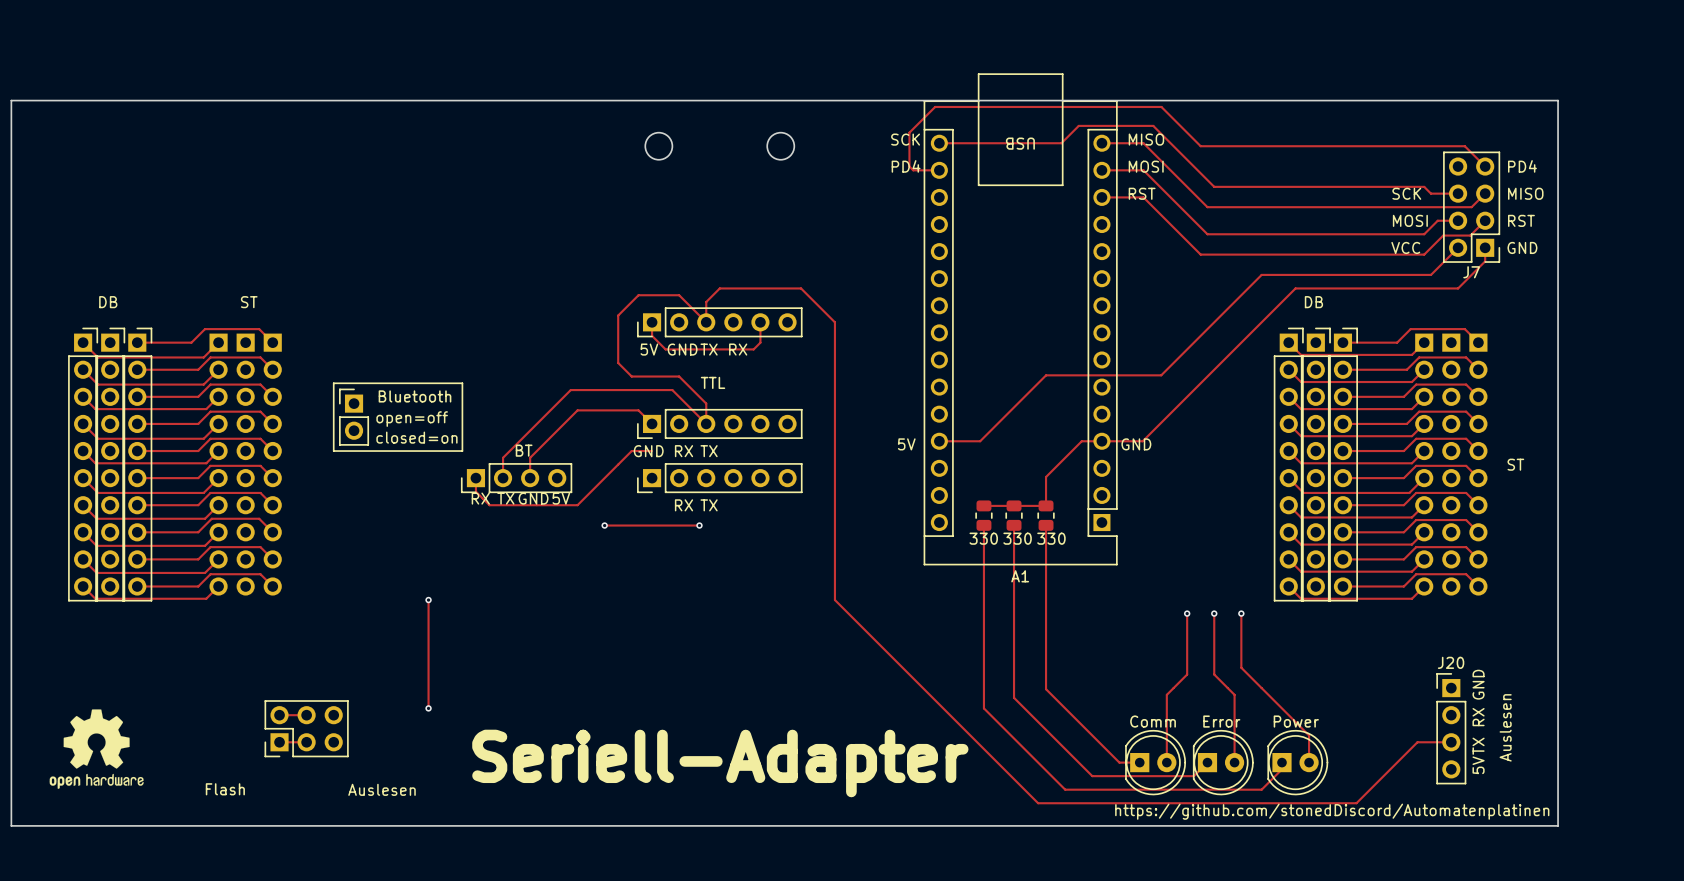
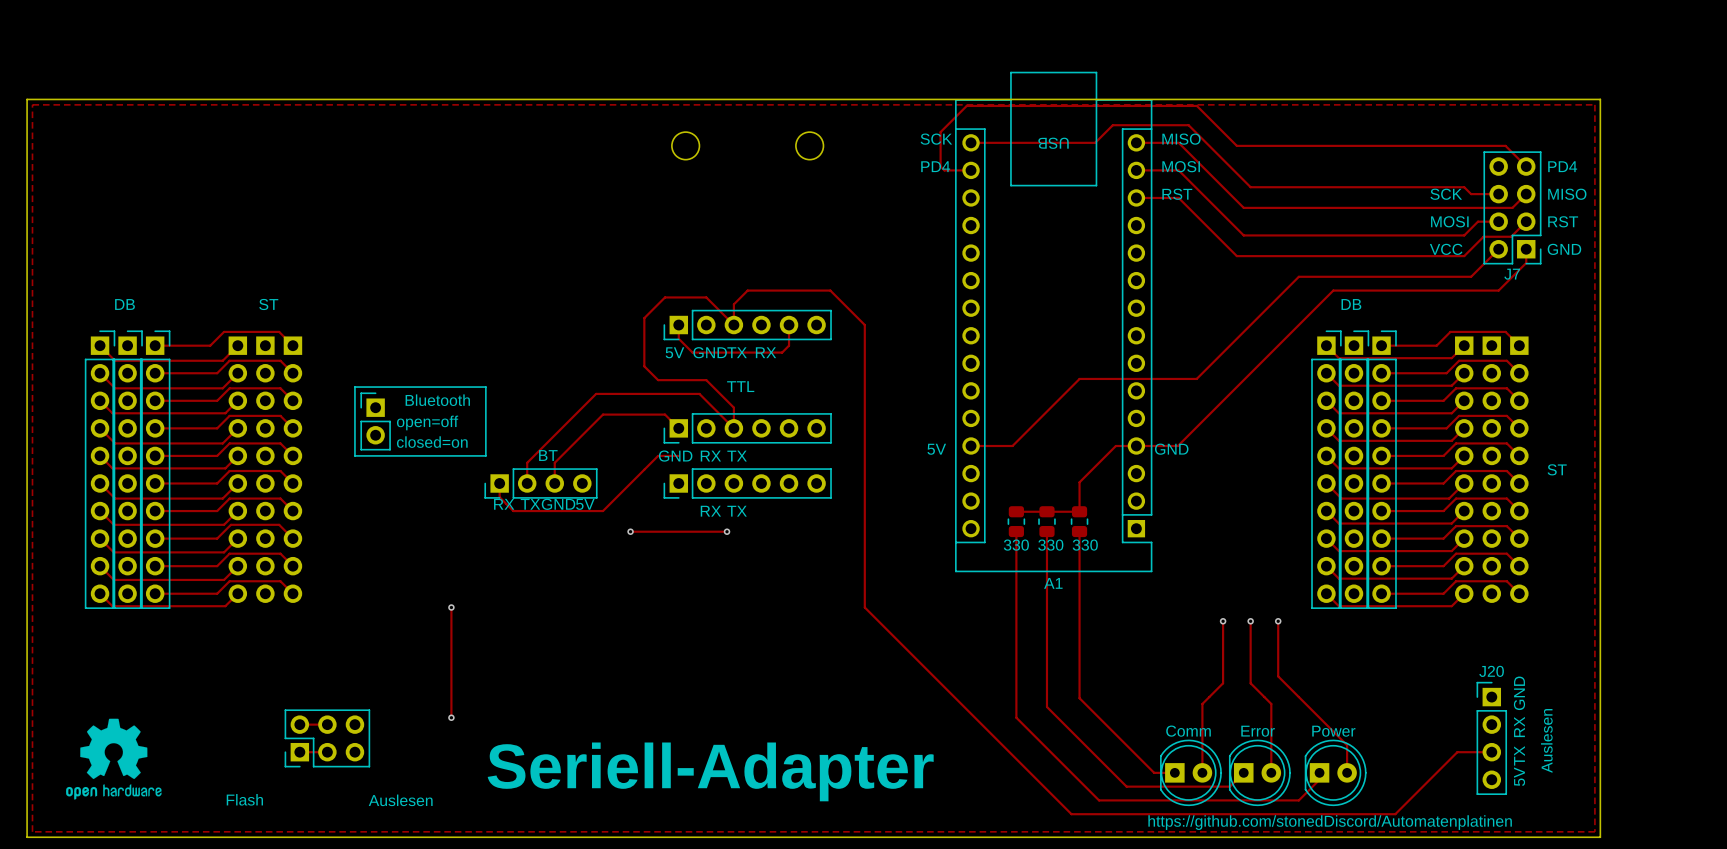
zone outline: none -> (32, 104) (1594, 104) (1594, 831) (32, 831) (32, 104)

